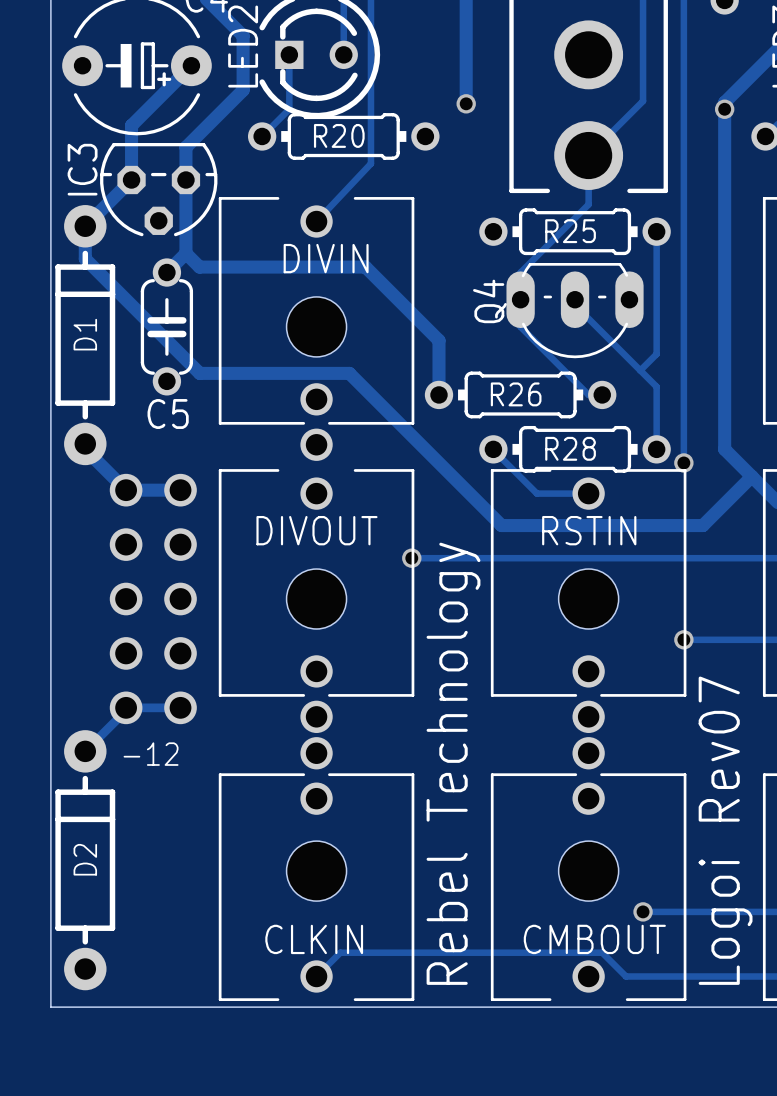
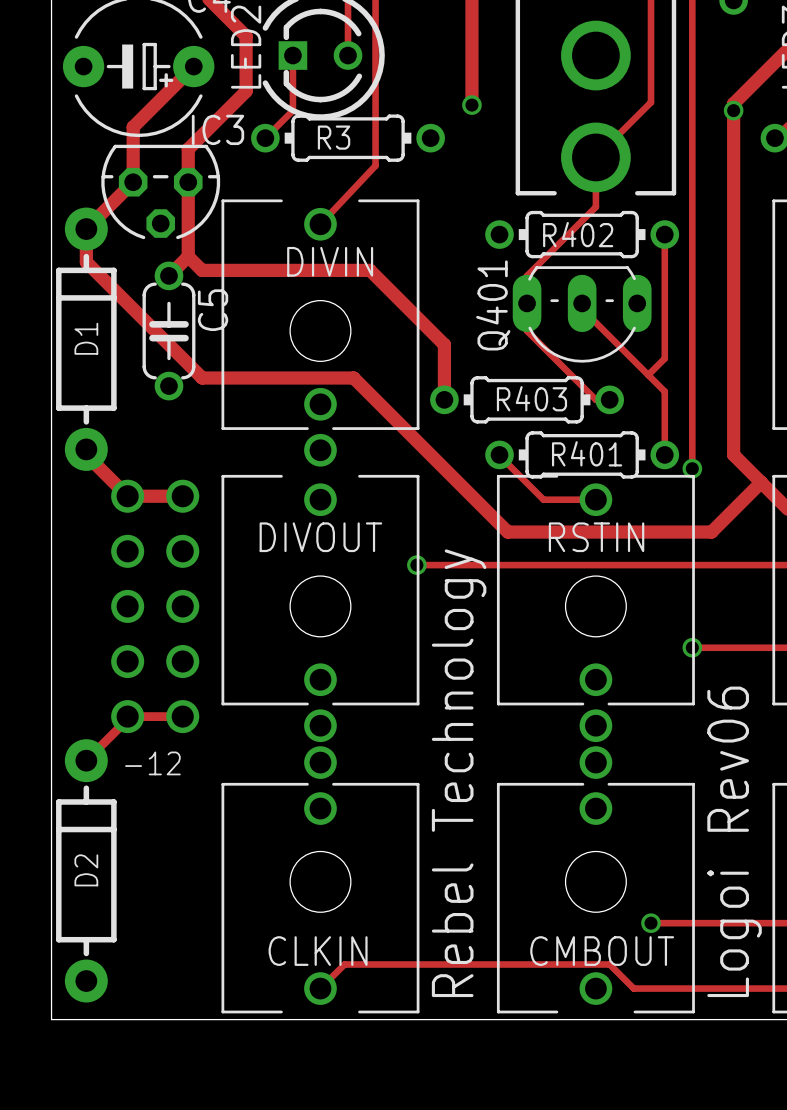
R20 name: R20 (339, 135) -> R3 (334, 137)
IC3 name rotation: 0° (82, 169) -> 90° clockwise (218, 129)
IC3 name position: IC3 (82, 169) -> IC3 (218, 129)
R25 name: R25 (570, 231) -> R402 (578, 234)
Q4 name: Q4 (489, 301) -> Q401 (493, 305)
R26 name: R26 (516, 394) -> R403 (531, 398)
C5 name rotation: 0° (168, 413) -> 90° counterclockwise (213, 310)
C5 name position: C5 (168, 413) -> C5 (213, 310)
R28 name: R28 (570, 448) -> R401 (587, 453)
text: Logoi Rev07 (725, 830) -> Logoi Rev06 (734, 841)

